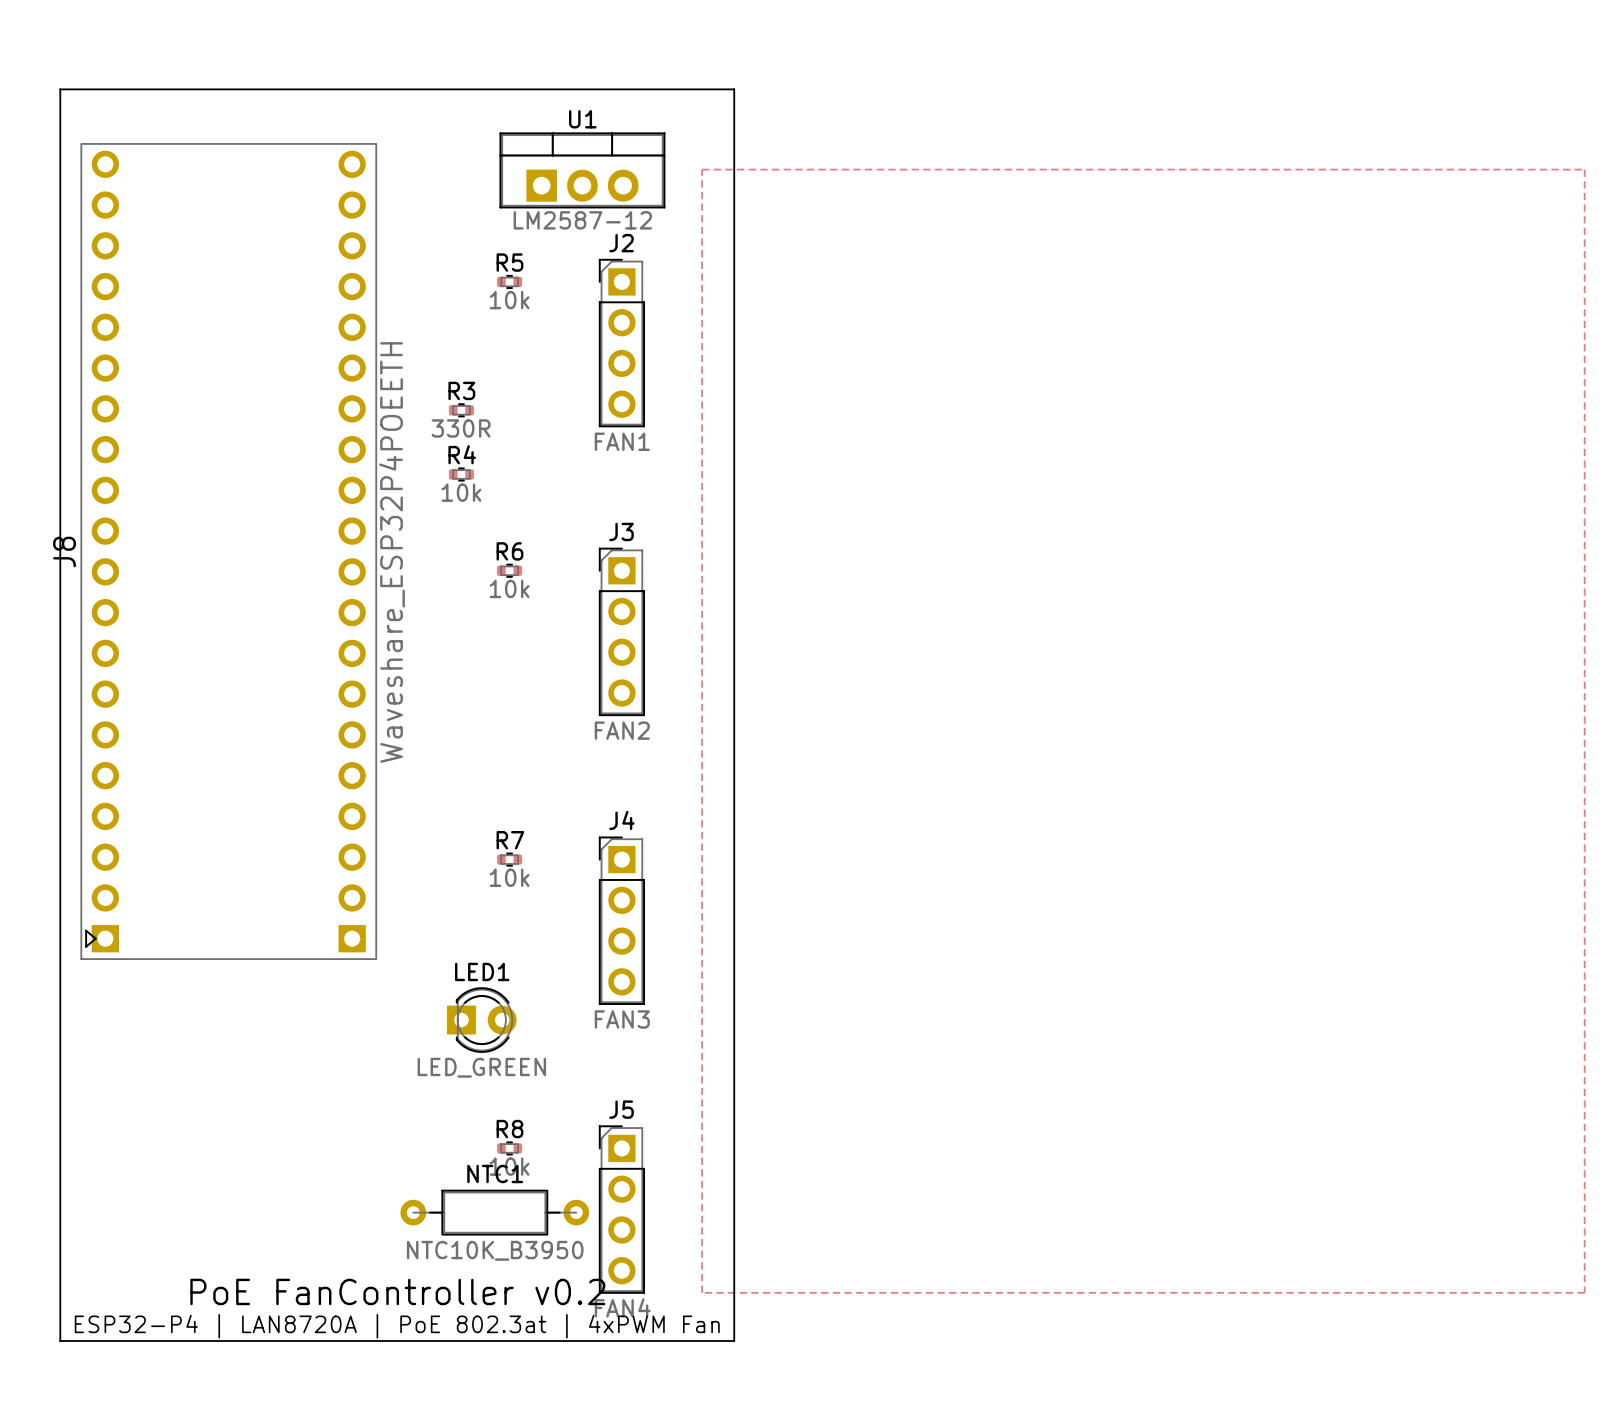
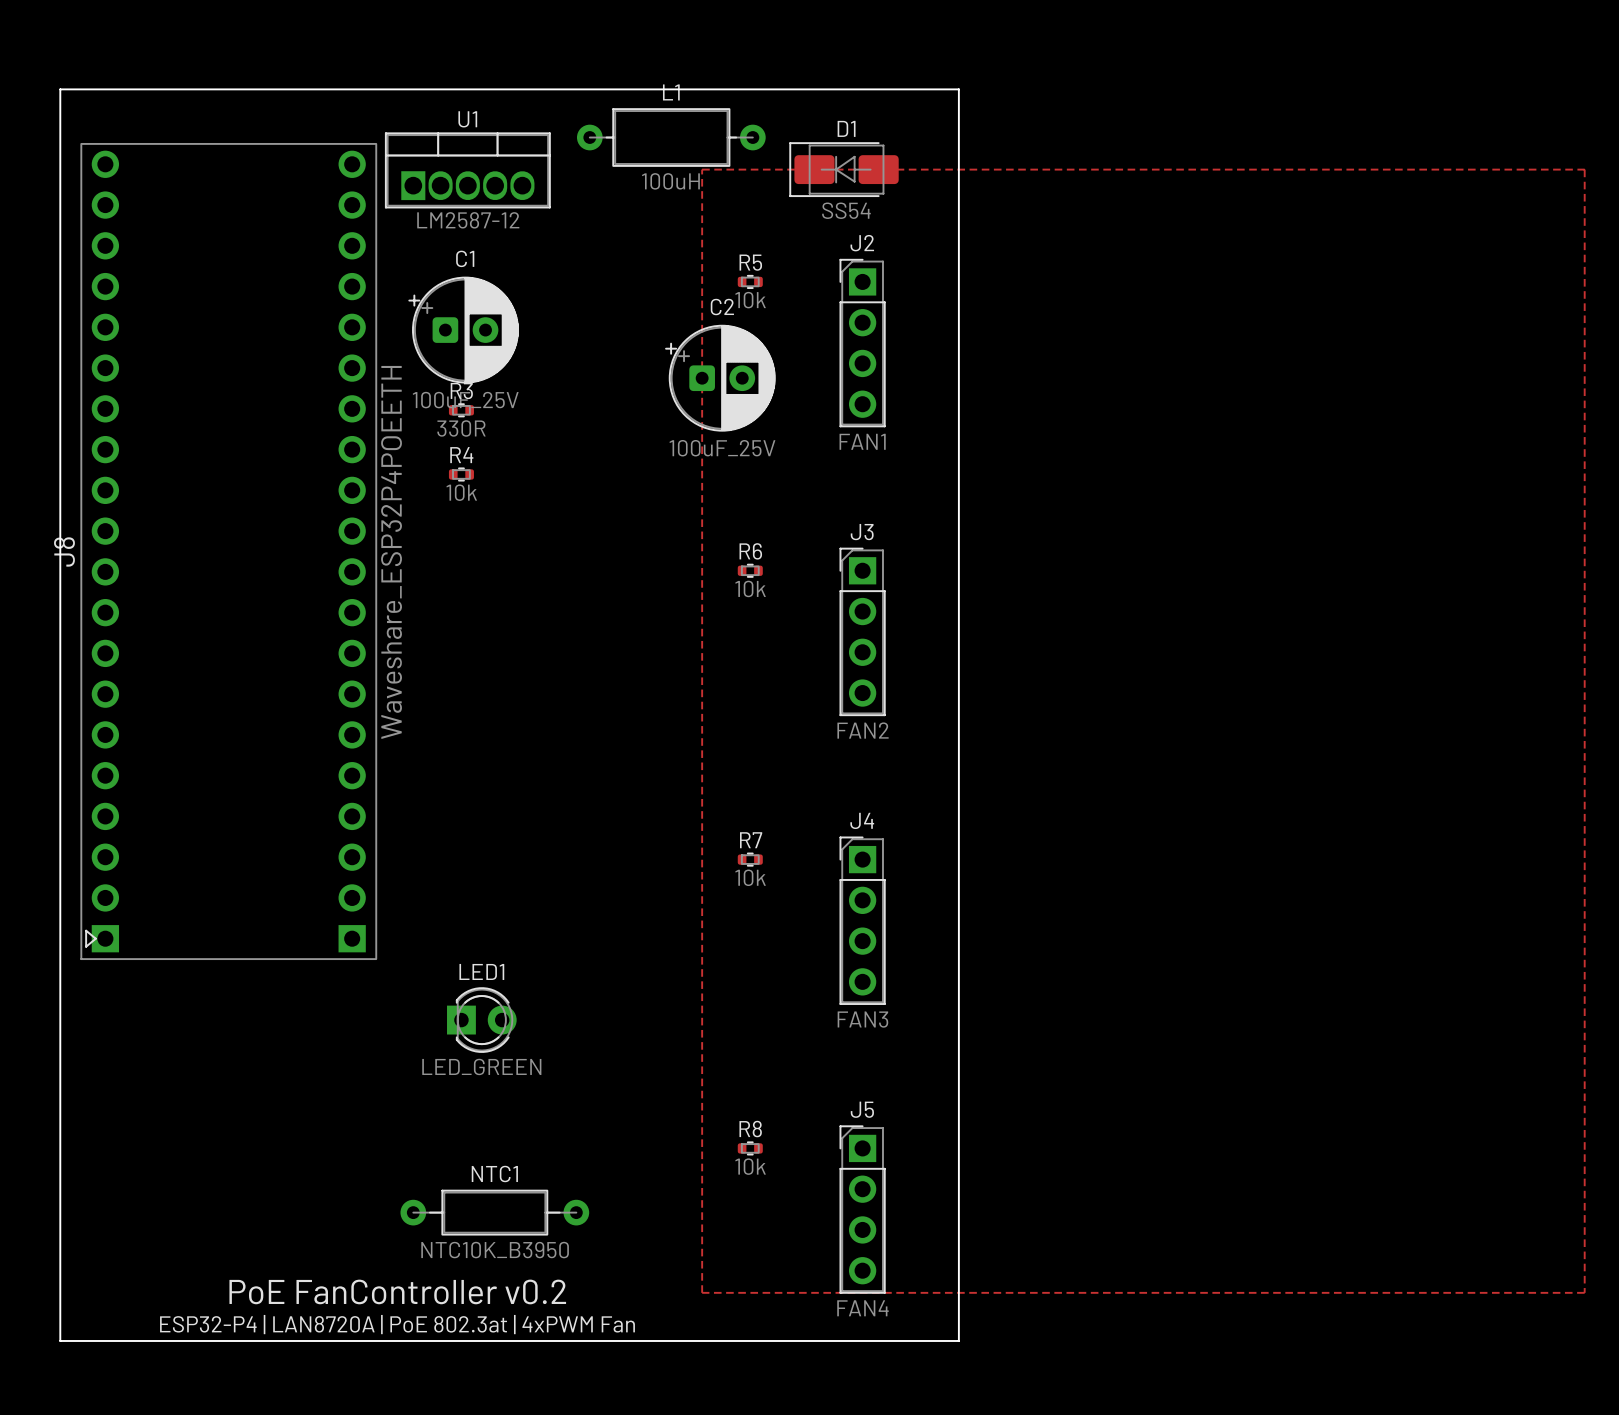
board edge: (734, 89) (734, 1340) -> (734, 89) (958, 89) (958, 1340) (734, 1340)
U1 footprint: [499, 132, 666, 209] -> [384, 132, 551, 209]
L1: none -> 100uH (671, 137)
D1: none -> SS54 (843, 169)
R5 position: (509, 281) -> (750, 281)
C1: none -> 100uF_25V (463, 330)
J2 position: (621, 343) -> (862, 343)
C2: none -> 100uF_25V (720, 378)
R6 position: (509, 570) -> (750, 570)
J3 position: (621, 631) -> (862, 631)
R7 position: (509, 859) -> (750, 859)
J4 position: (621, 920) -> (862, 920)
R8 position: (509, 1148) -> (750, 1148)
J5 position: (621, 1209) -> (862, 1209)

